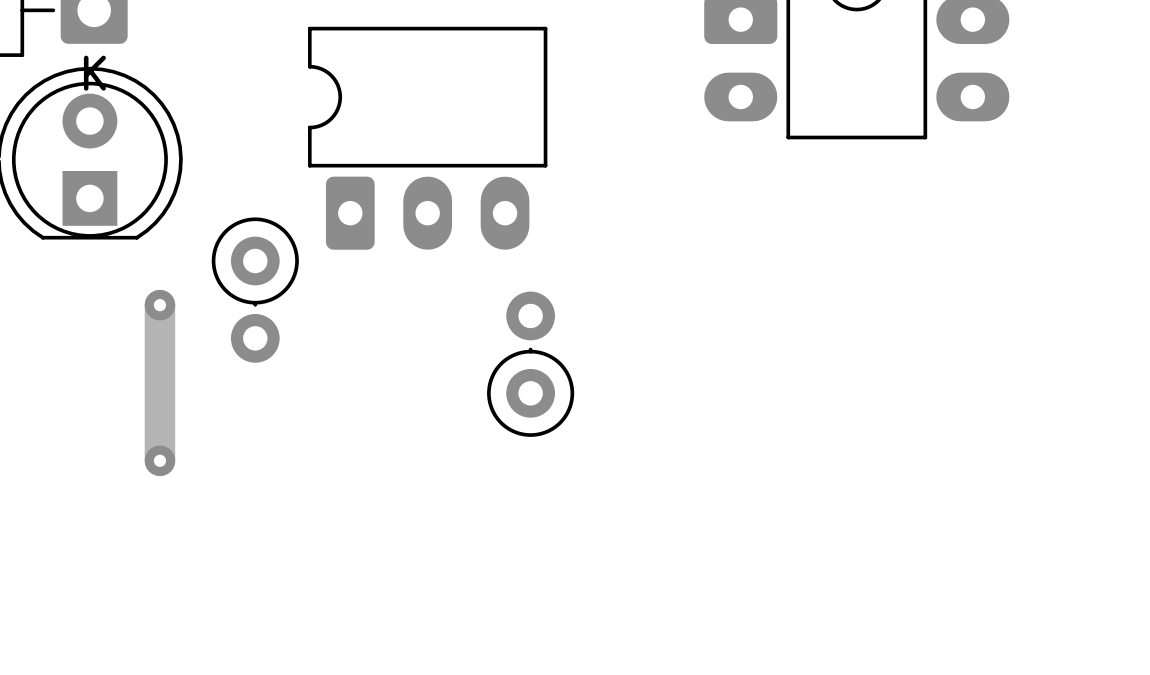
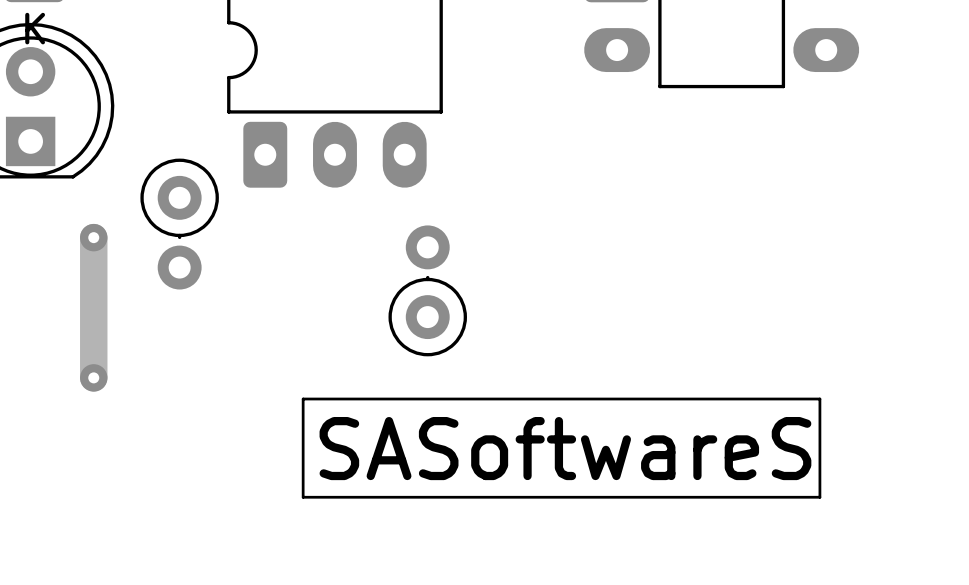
line: none -> (303, 399) (819, 399) (819, 497) (303, 497) (303, 399)
text: none -> SASoftwareS (565, 448)

